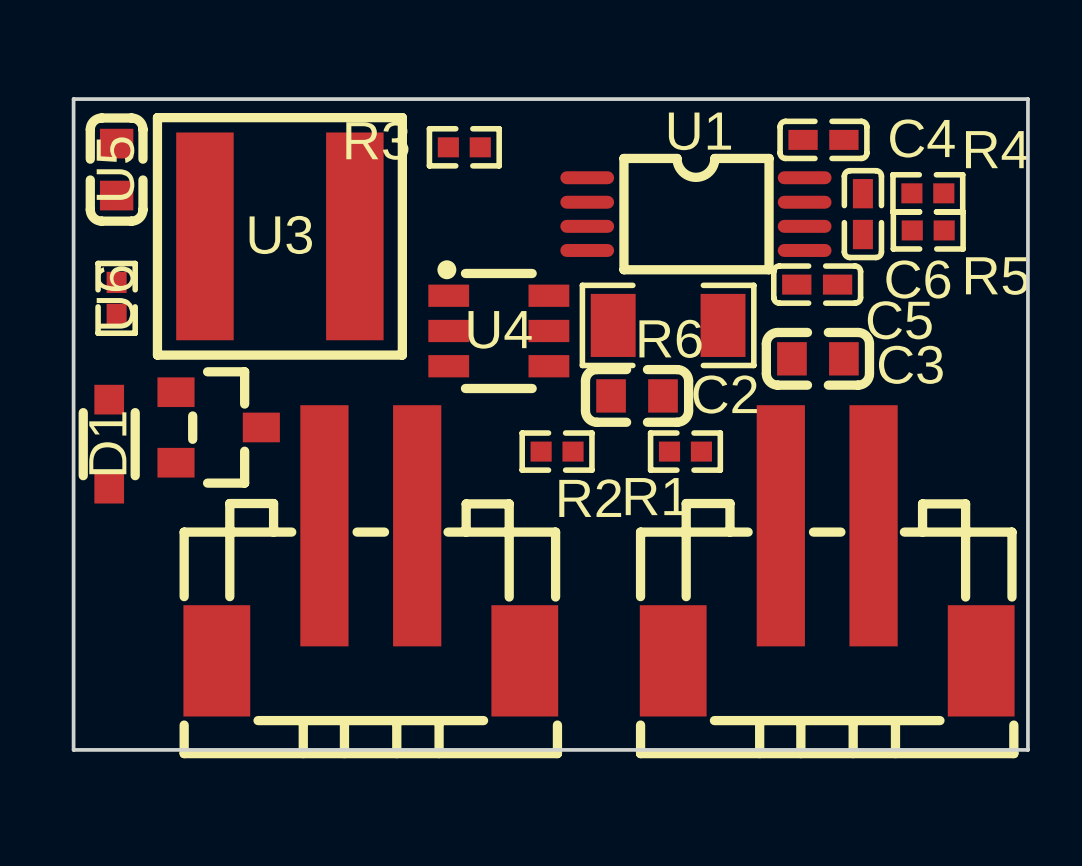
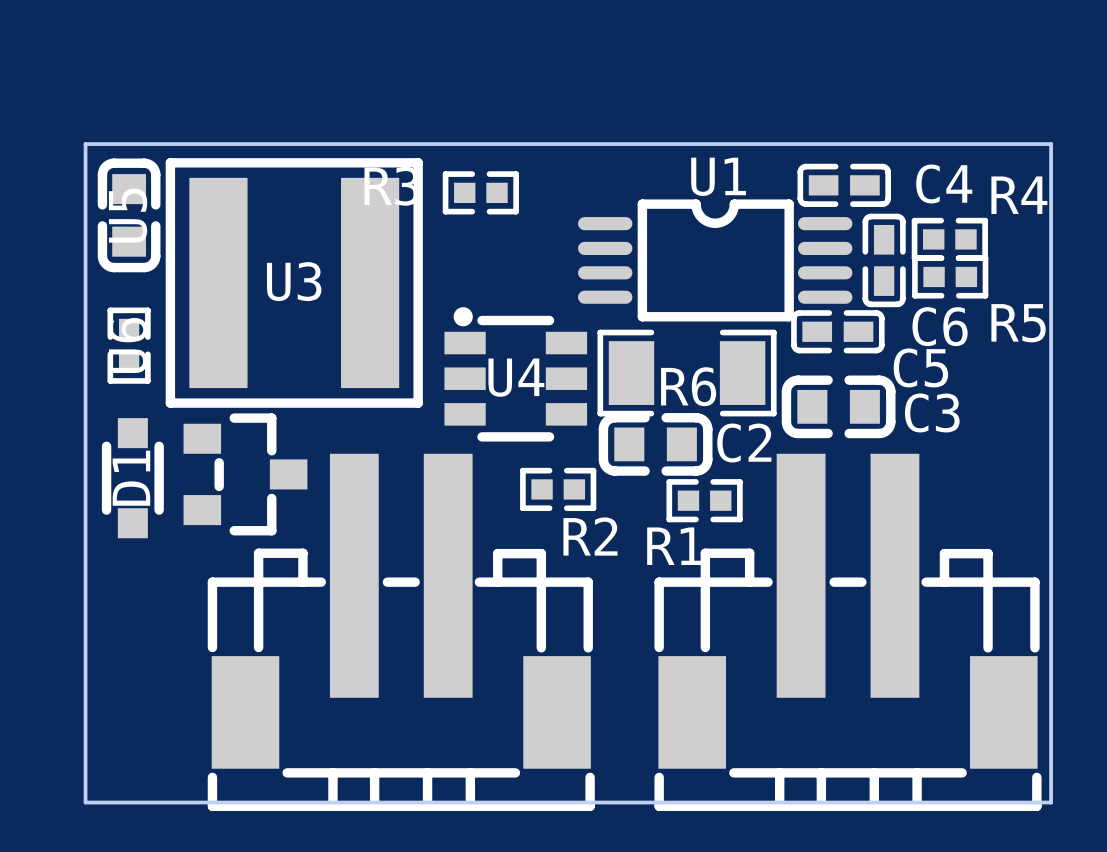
part position: (218, 427) -> (245, 474)
D1 position: (109, 444) -> (132, 478)
R2 position: (557, 451) -> (558, 489)
part position: (370, 581) -> (401, 632)

